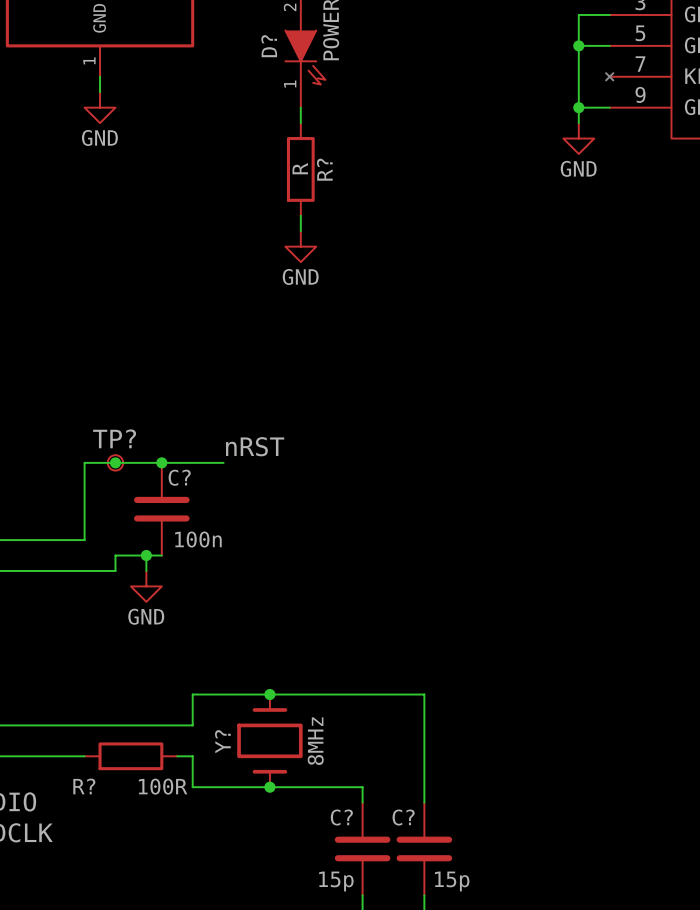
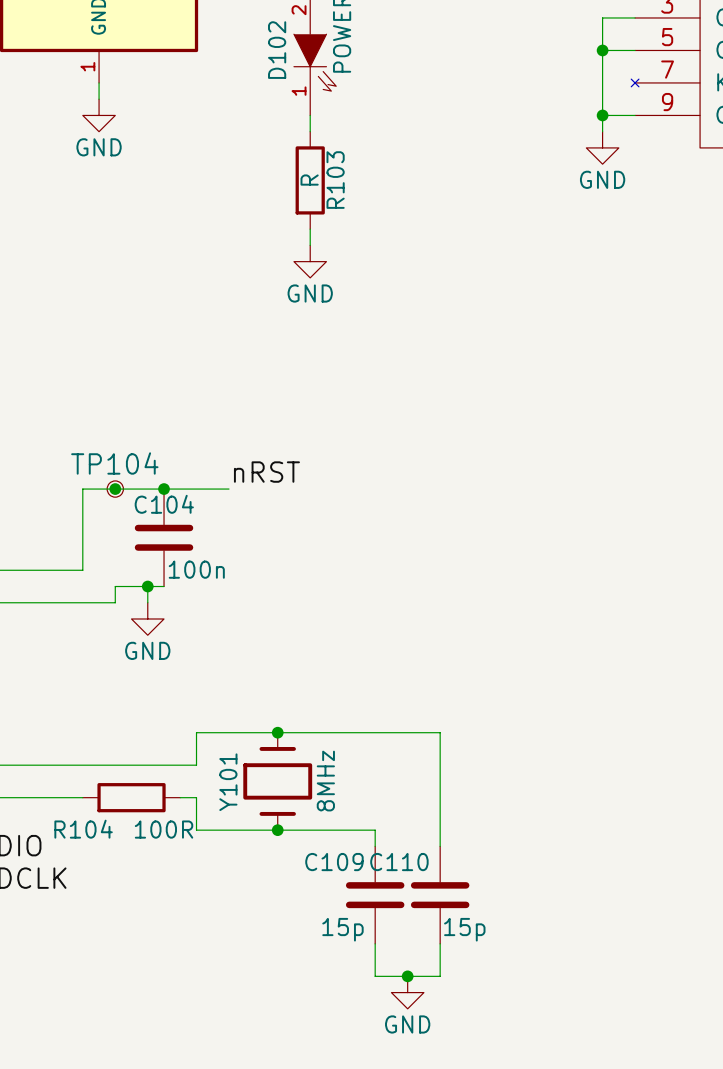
D? name: D? (269, 46) -> D102 (277, 50)
R? name: R? (324, 169) -> R103 (335, 180)
TP? name: TP? (114, 438) -> TP104 (114, 463)
C? name: C? (179, 477) -> C104 (164, 504)
Y? name: Y? (222, 741) -> Y101 (228, 782)
R? name: R? (84, 786) -> R104 (83, 829)
C? name: C? (341, 817) -> C109 (334, 862)
C? name: C? (403, 817) -> C110 (399, 862)

